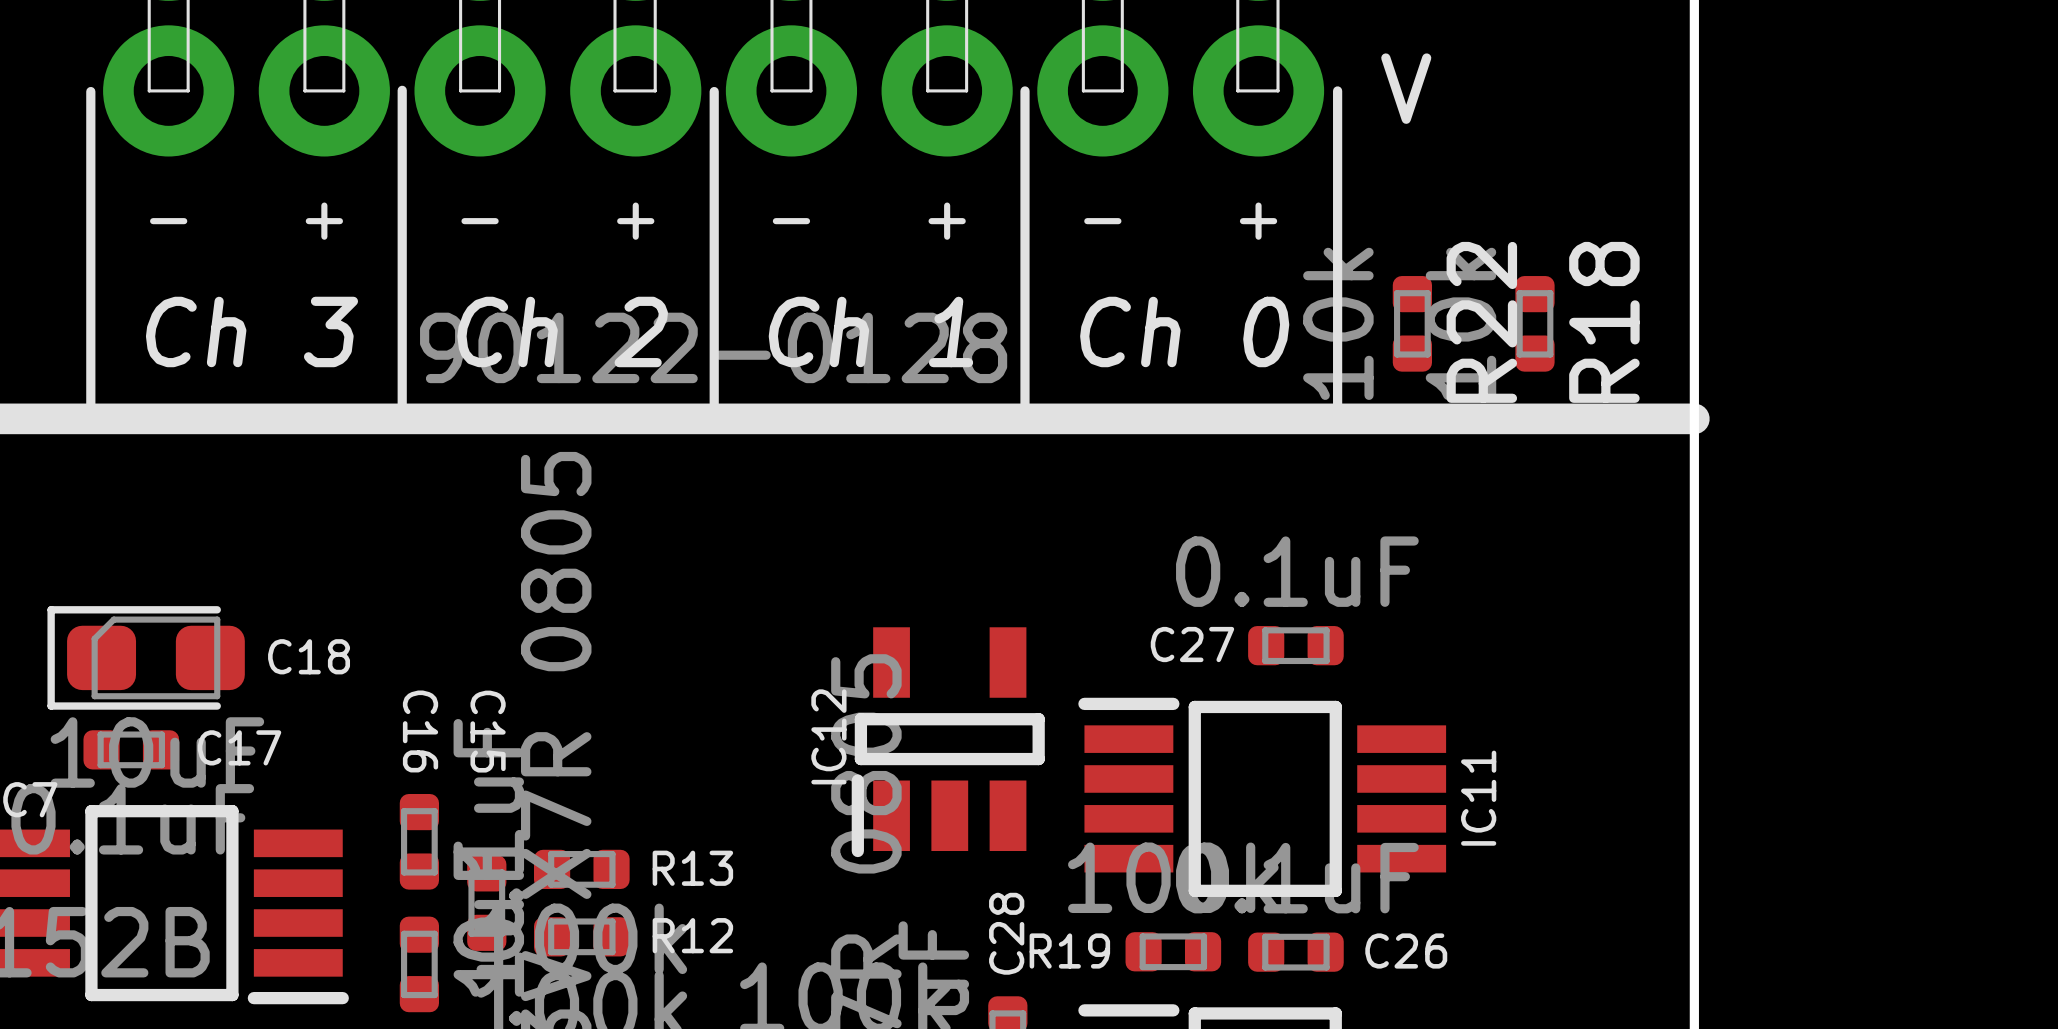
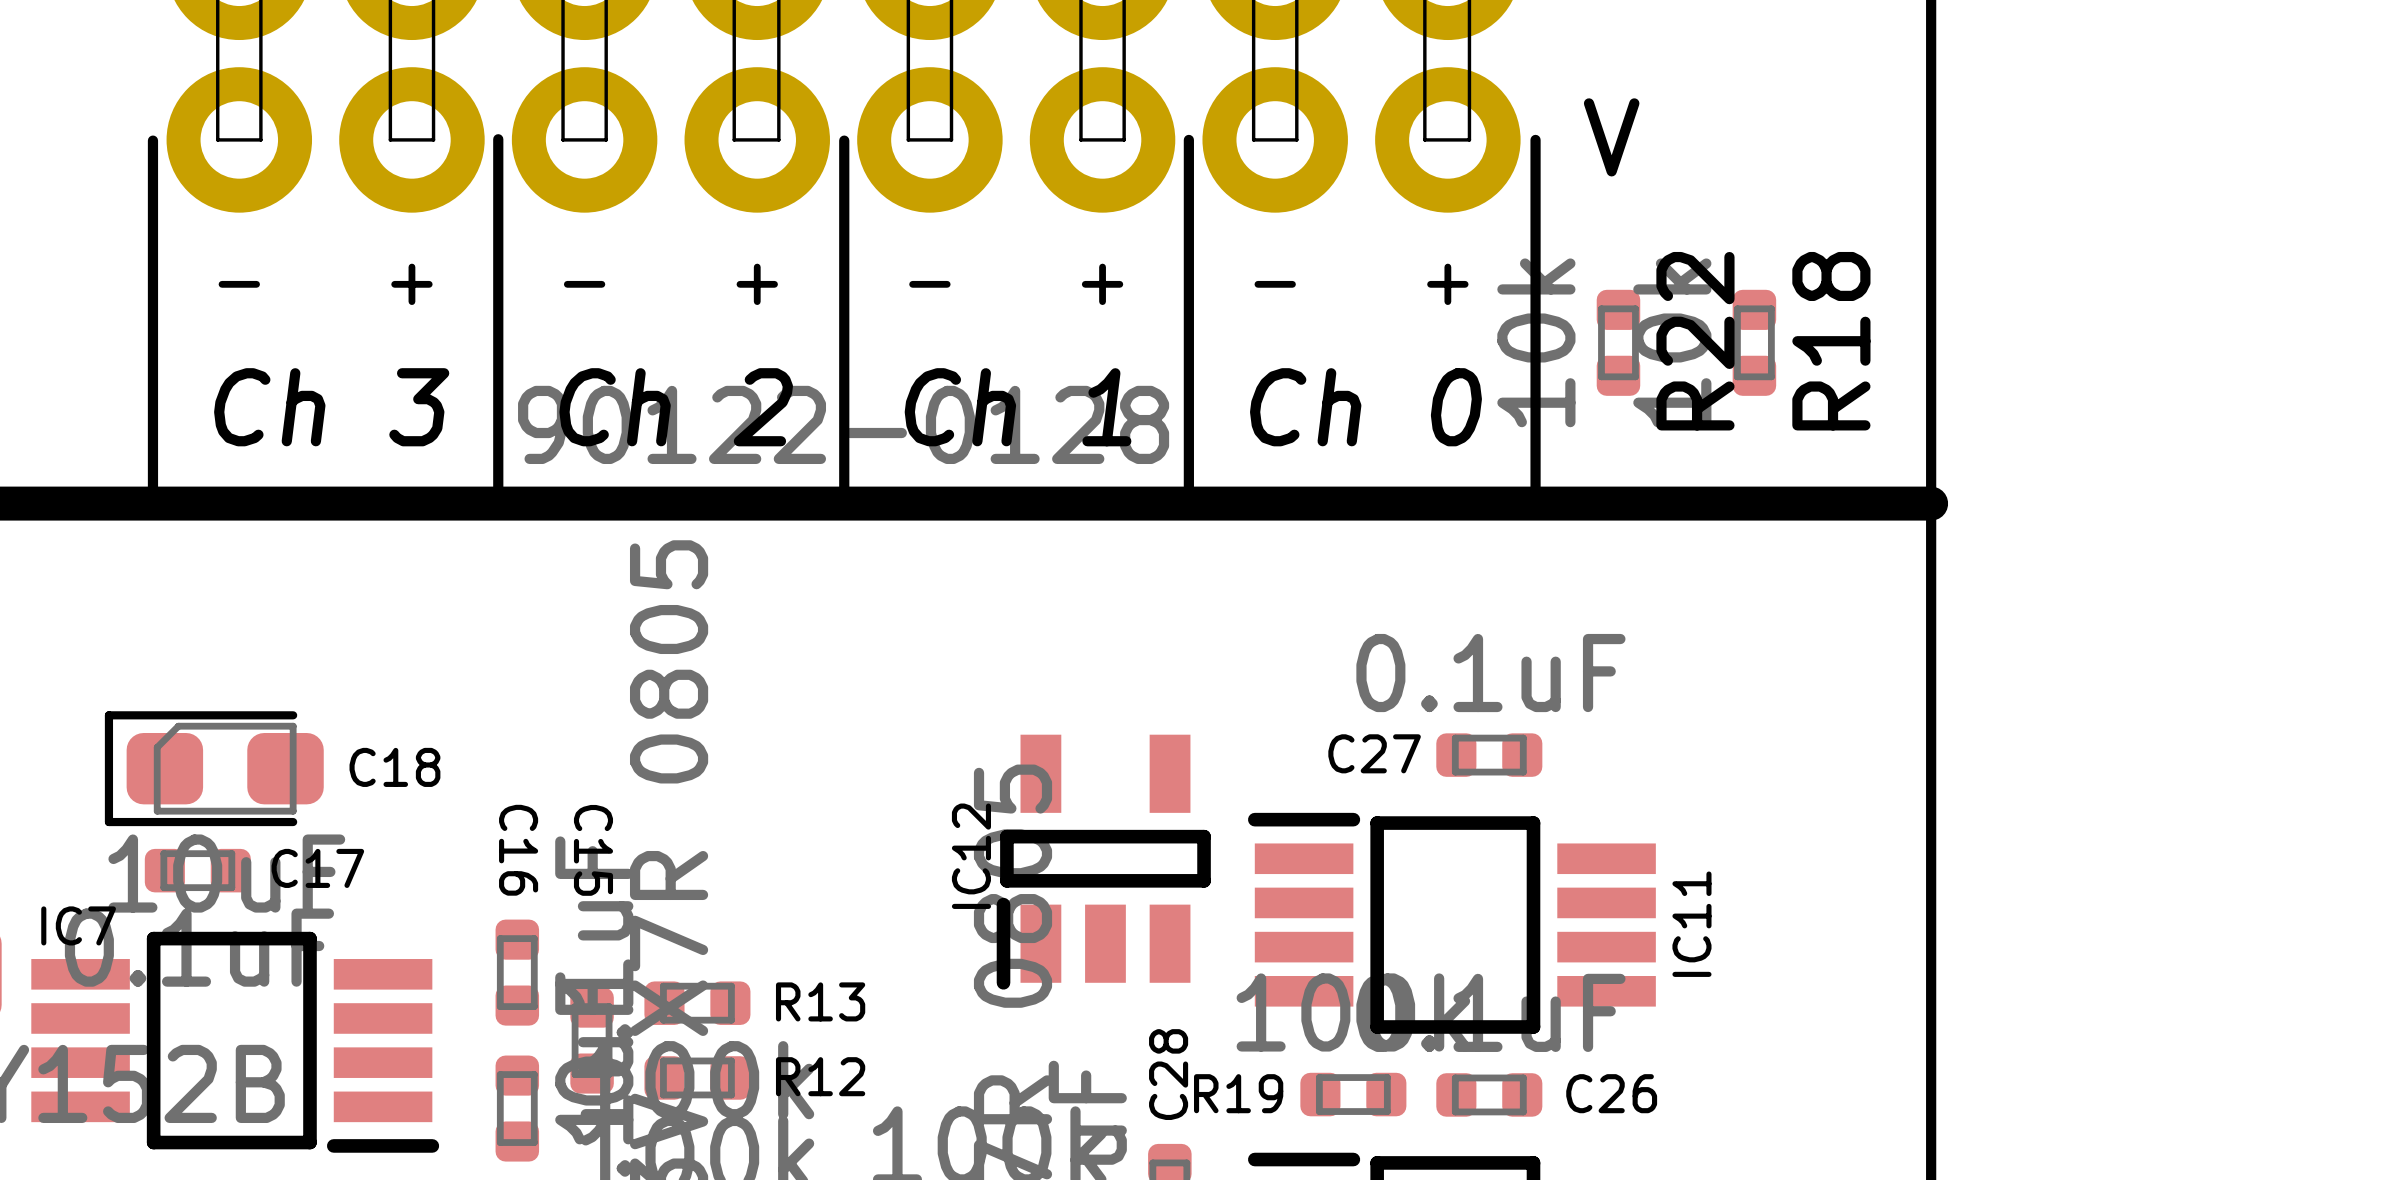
R22 position: (1412, 323) -> (1618, 342)
R18 position: (1534, 323) -> (1754, 342)

